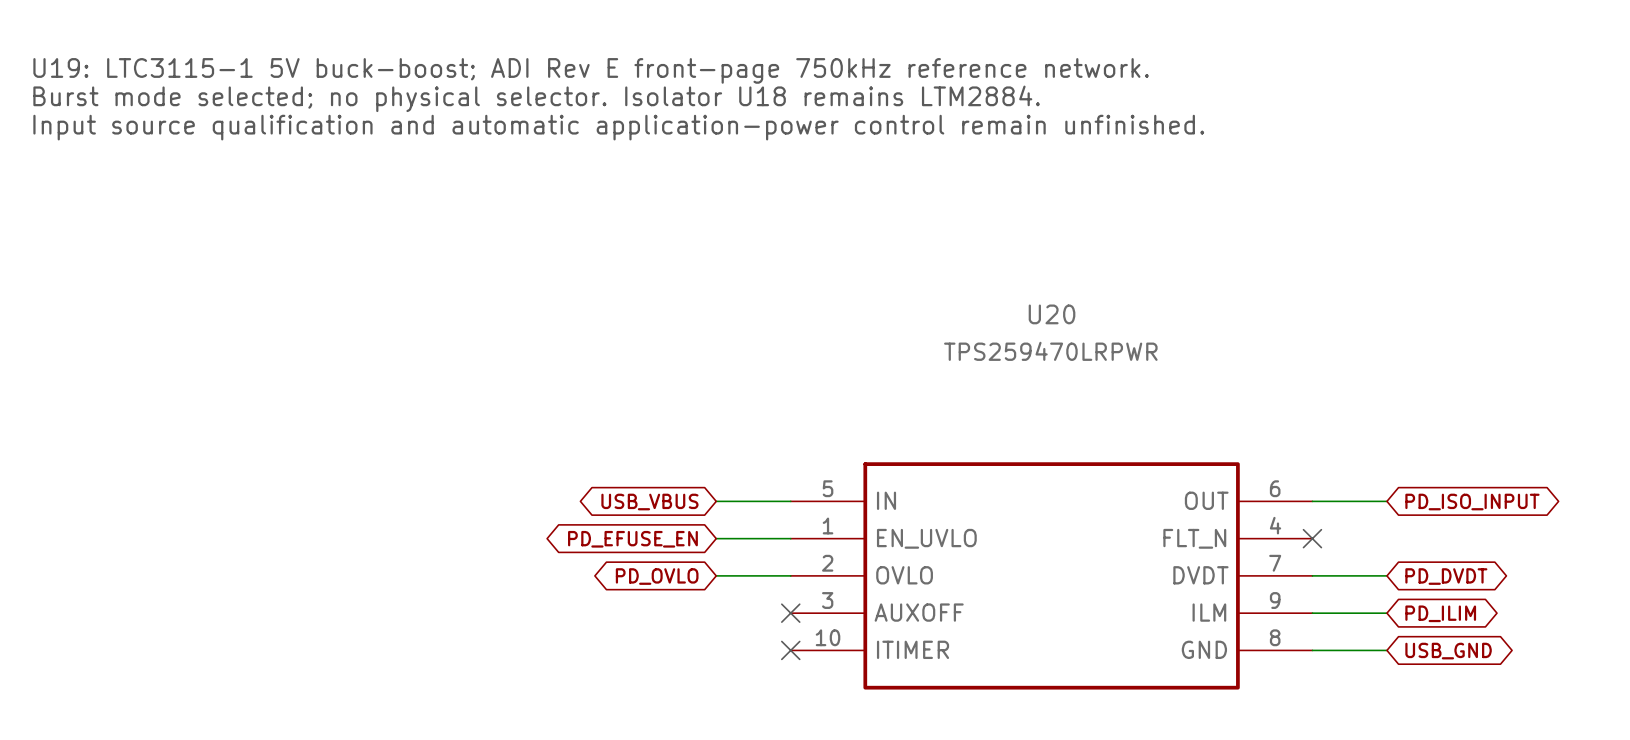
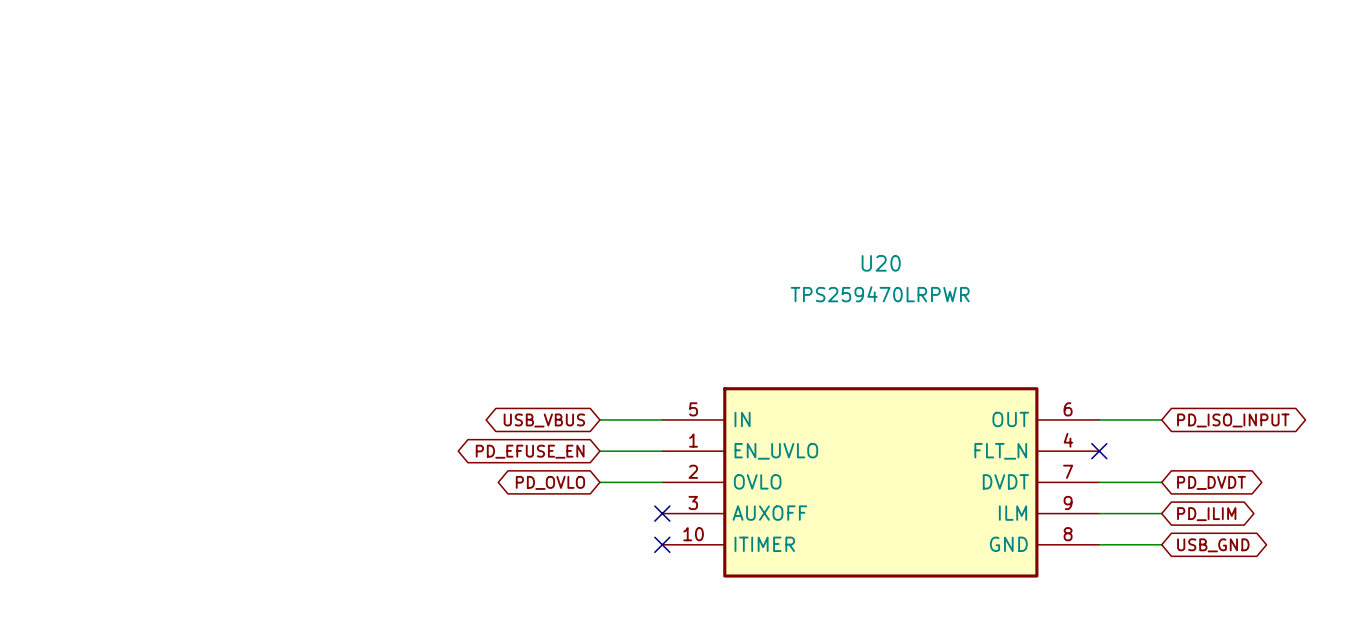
text: U19: LTC3115-1 5V buck-boost; ADI Rev E front-page 750kHz reference network. (591, 70) -> none
text: Burst mode selected; no physical selector. Isolator U18 remains LTM2884. (536, 98) -> none
text: Input source qualification and automatic application-power control remain unfinished. (618, 127) -> none

